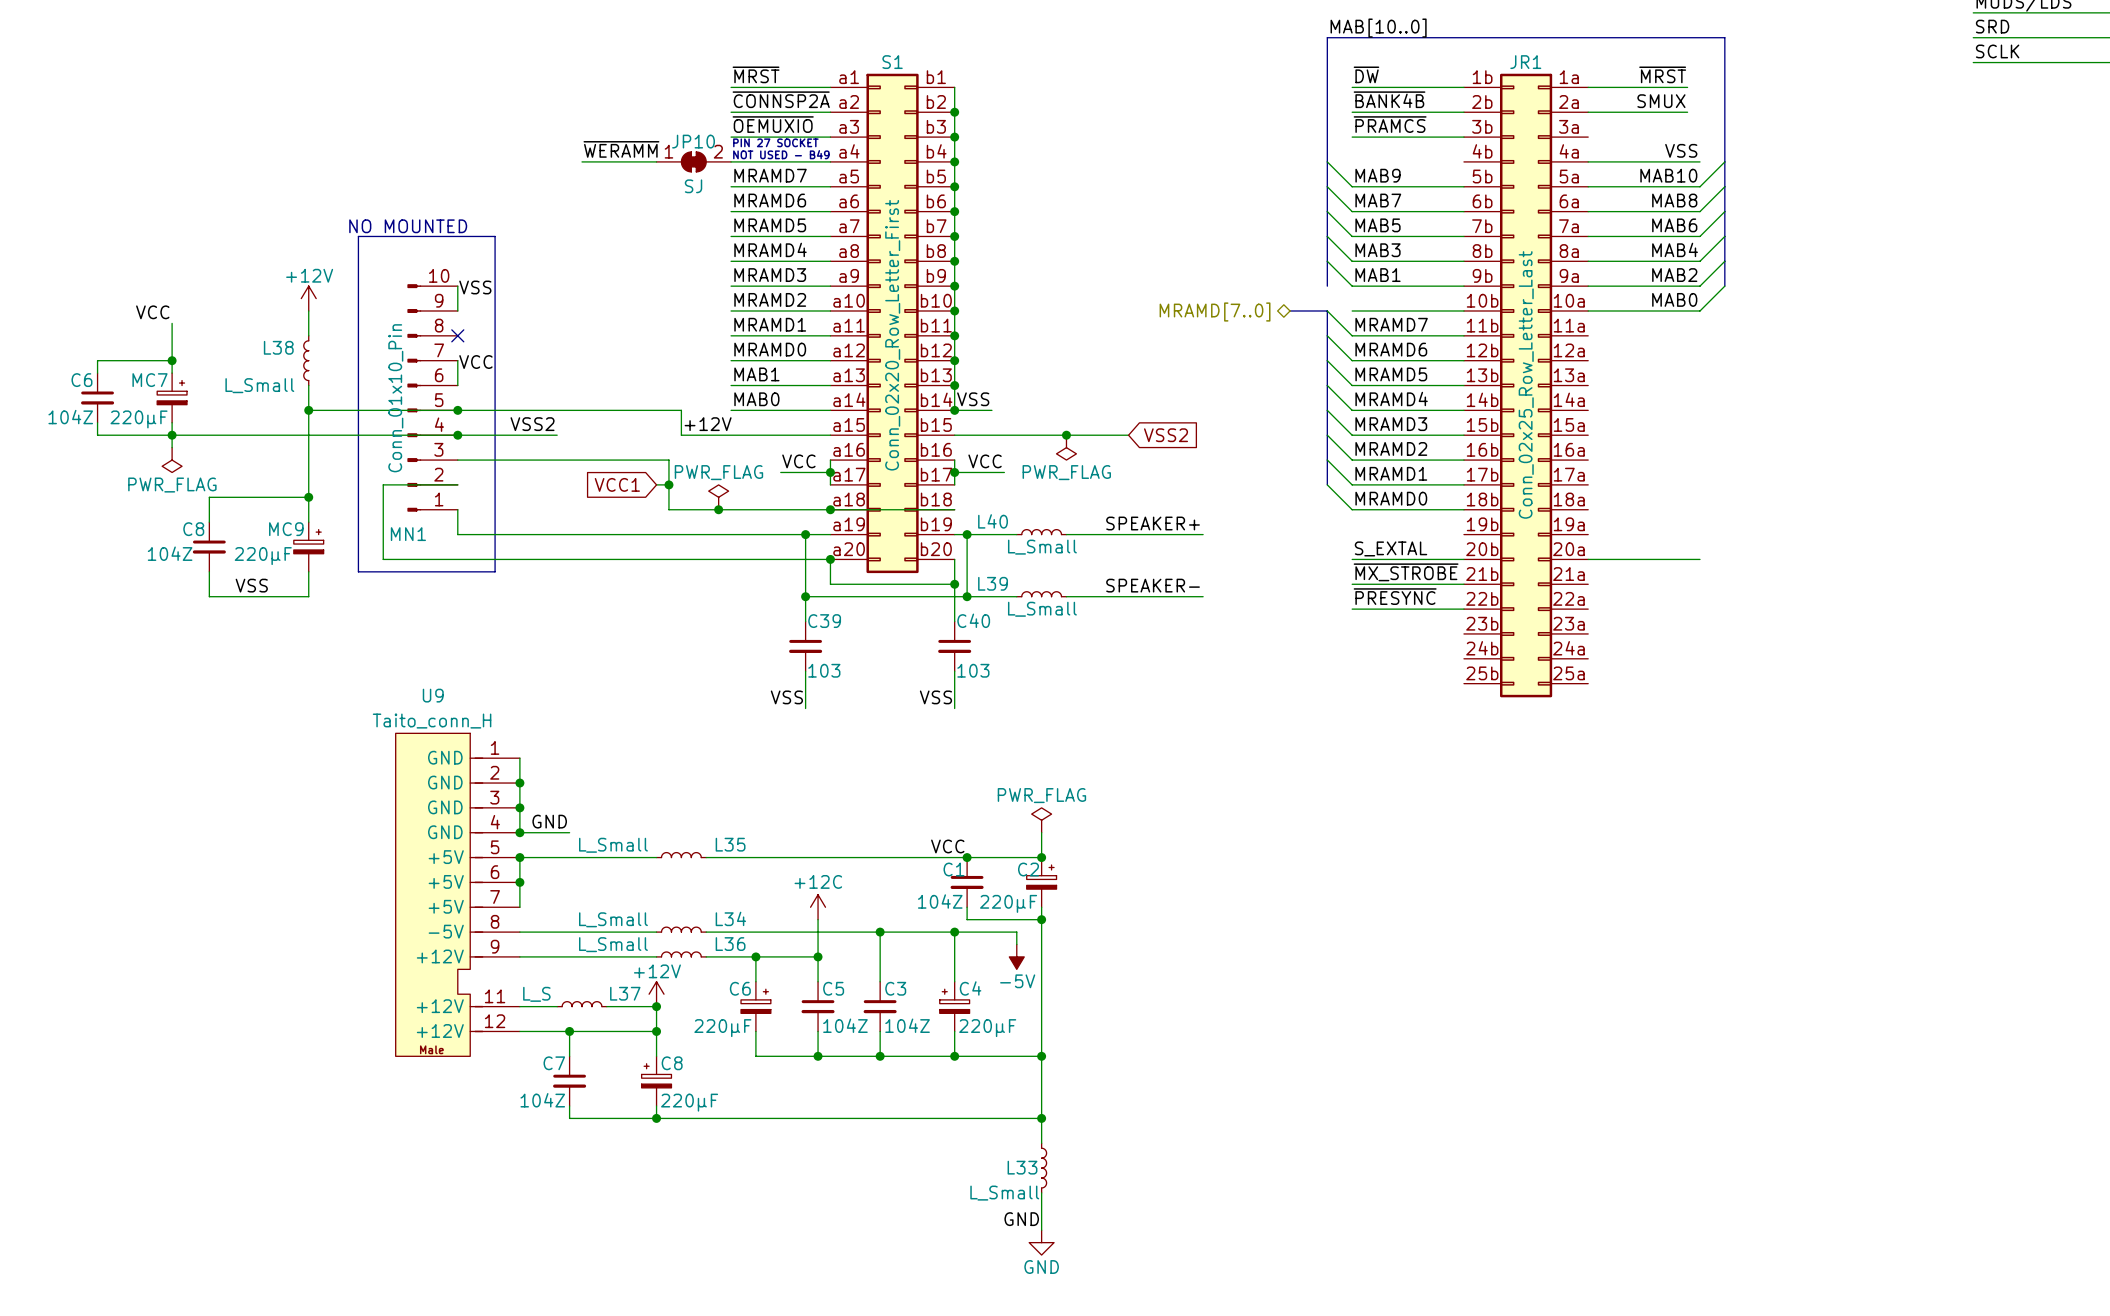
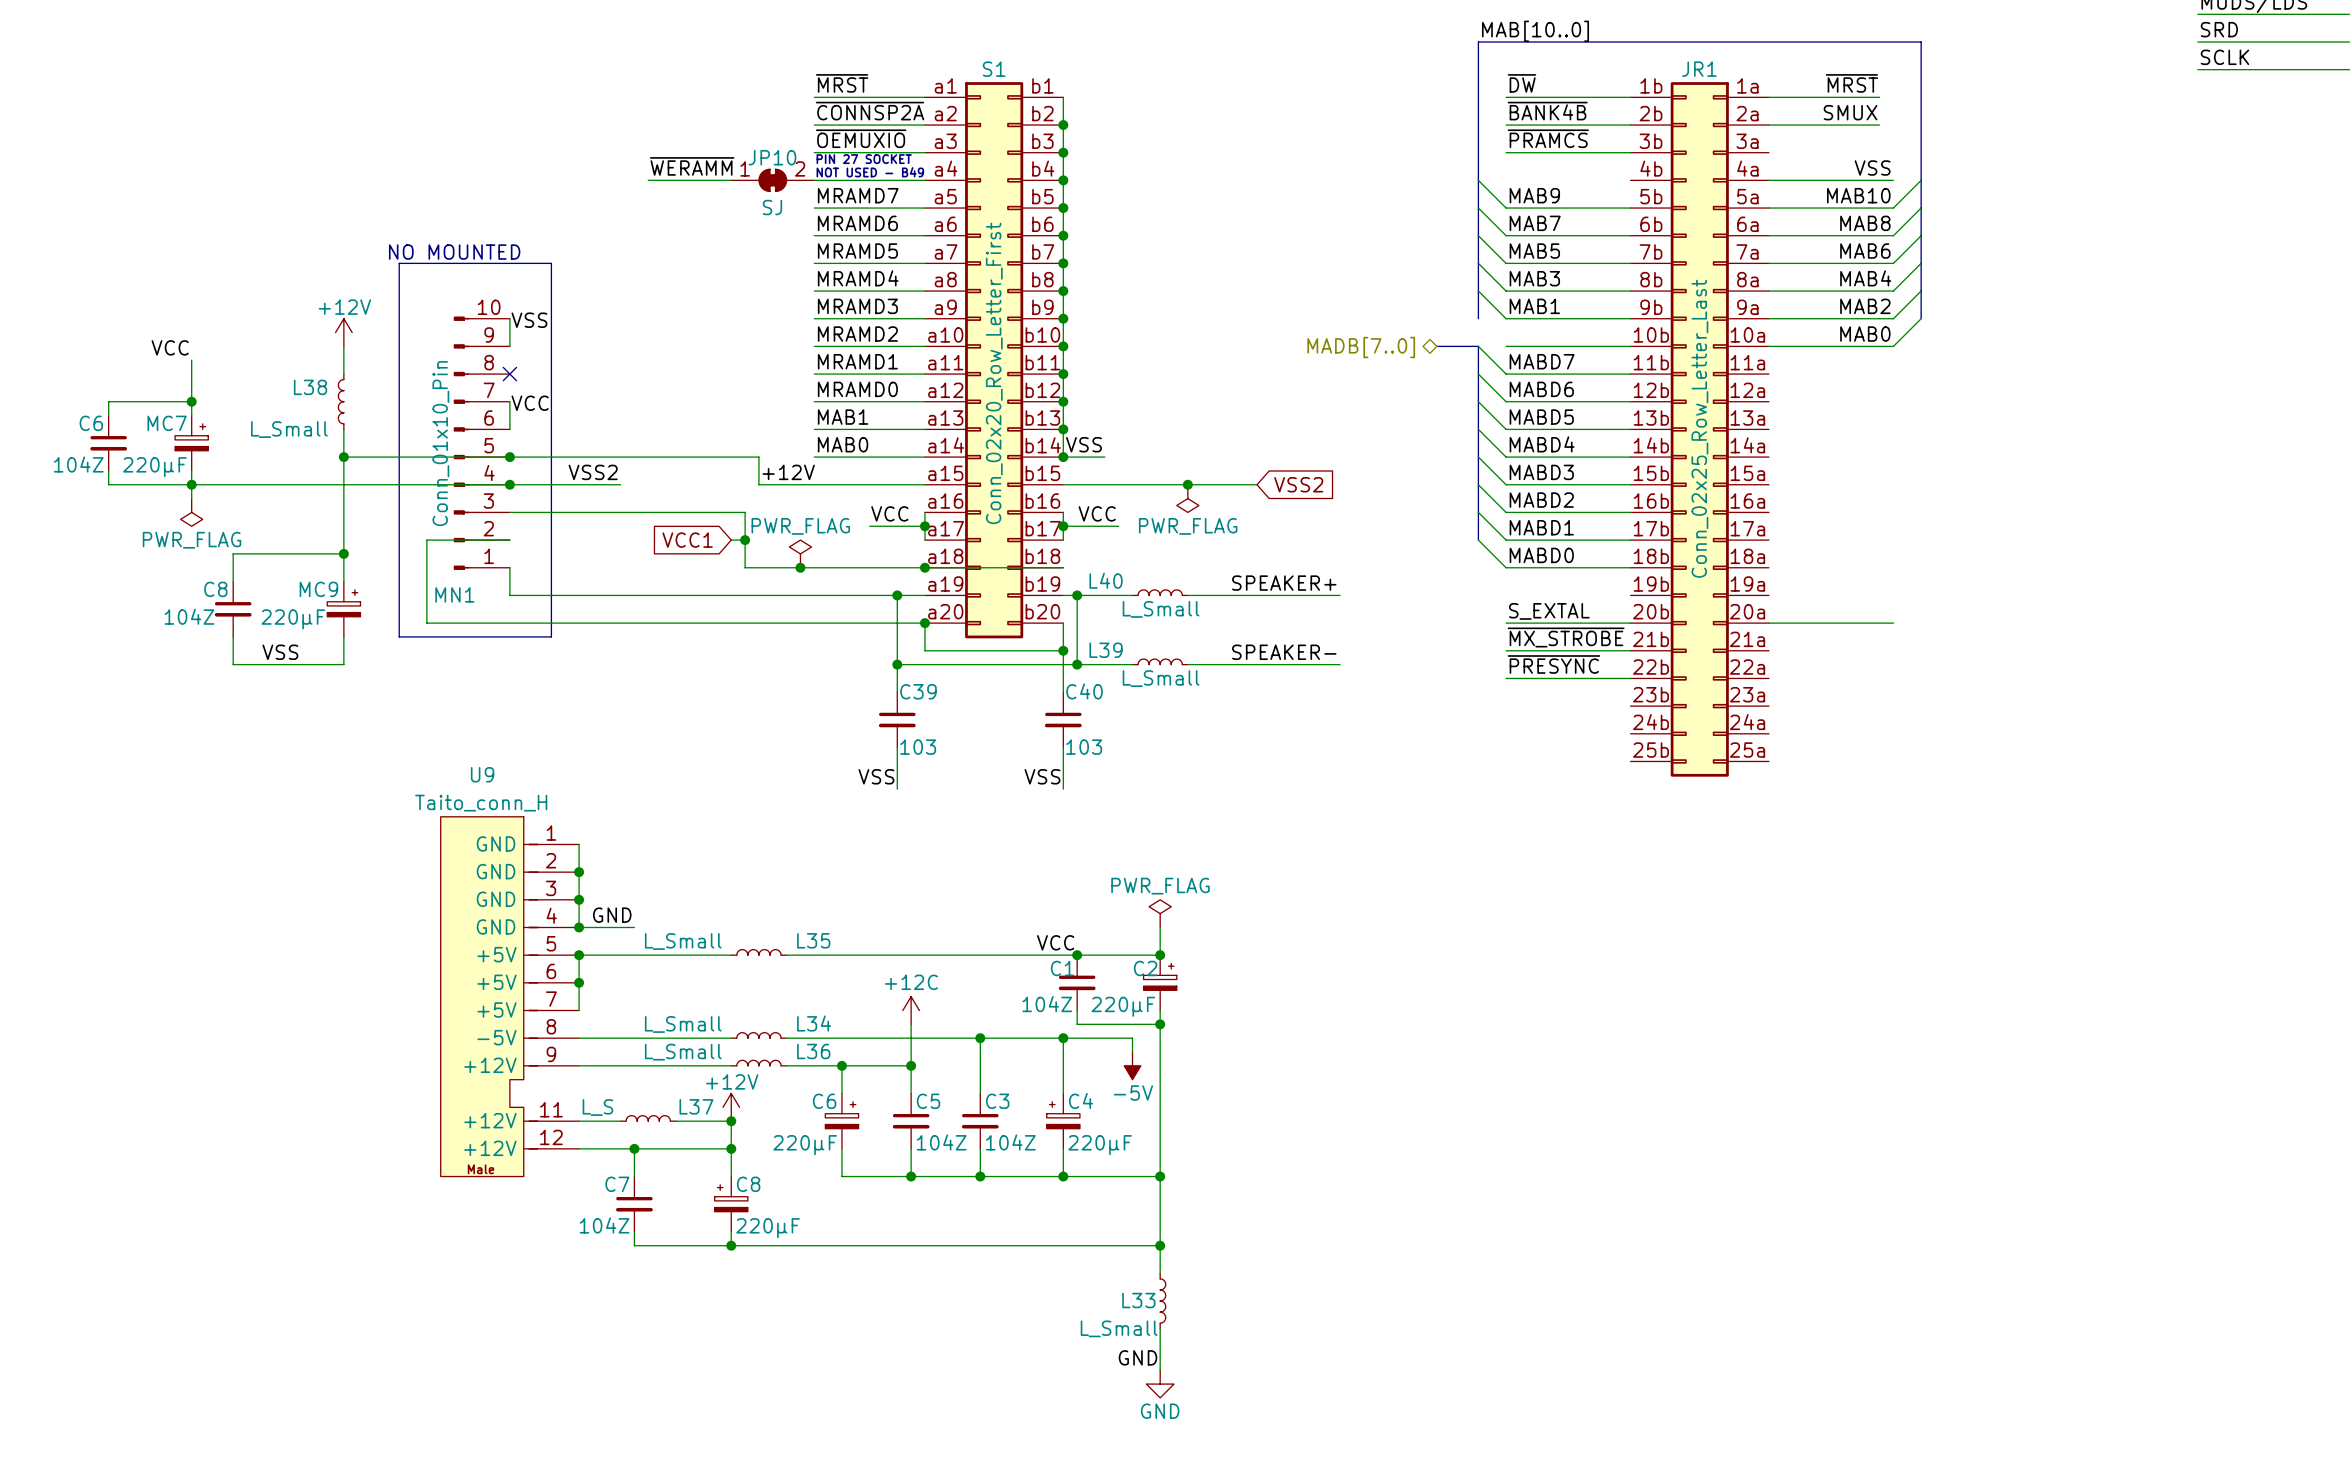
hierarchical label: MRAMD[7..0] (1215, 312) -> MADB[7..0] (1361, 347)
label: MRAMD7 (1391, 324) -> MABD7 (1542, 361)
label: MRAMD6 (1391, 349) -> MABD6 (1541, 389)
label: MRAMD5 (1391, 374) -> MABD5 (1541, 417)
label: MRAMD4 (1391, 398) -> MABD4 (1542, 444)
label: MRAMD3 (1391, 424) -> MABD3 (1541, 472)
label: MRAMD2 (1391, 448) -> MABD2 (1541, 500)
label: MRAMD1 (1391, 473) -> MABD1 (1541, 527)
label: MRAMD0 (1391, 498) -> MABD0 (1541, 555)

